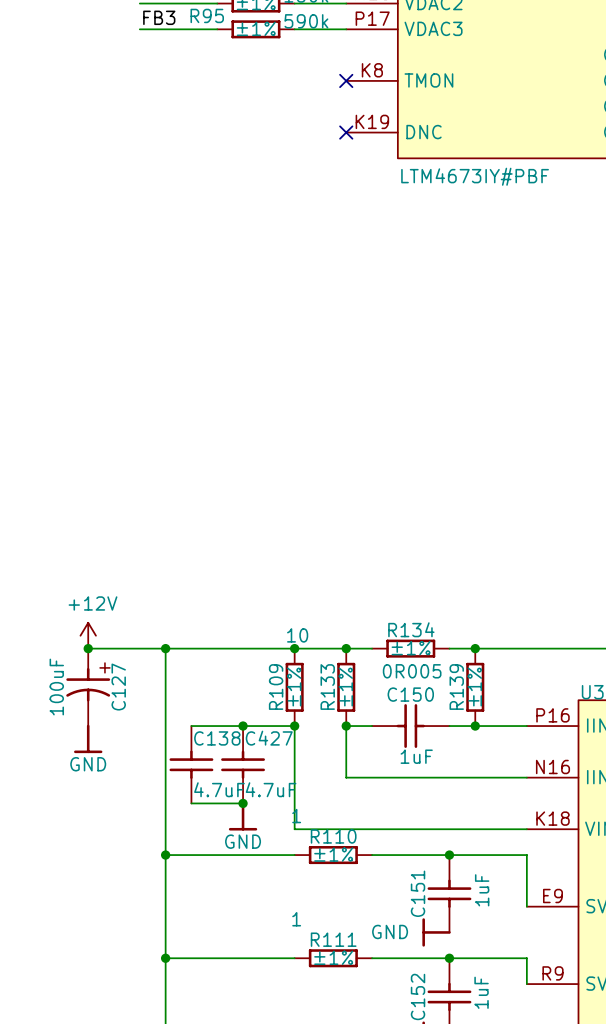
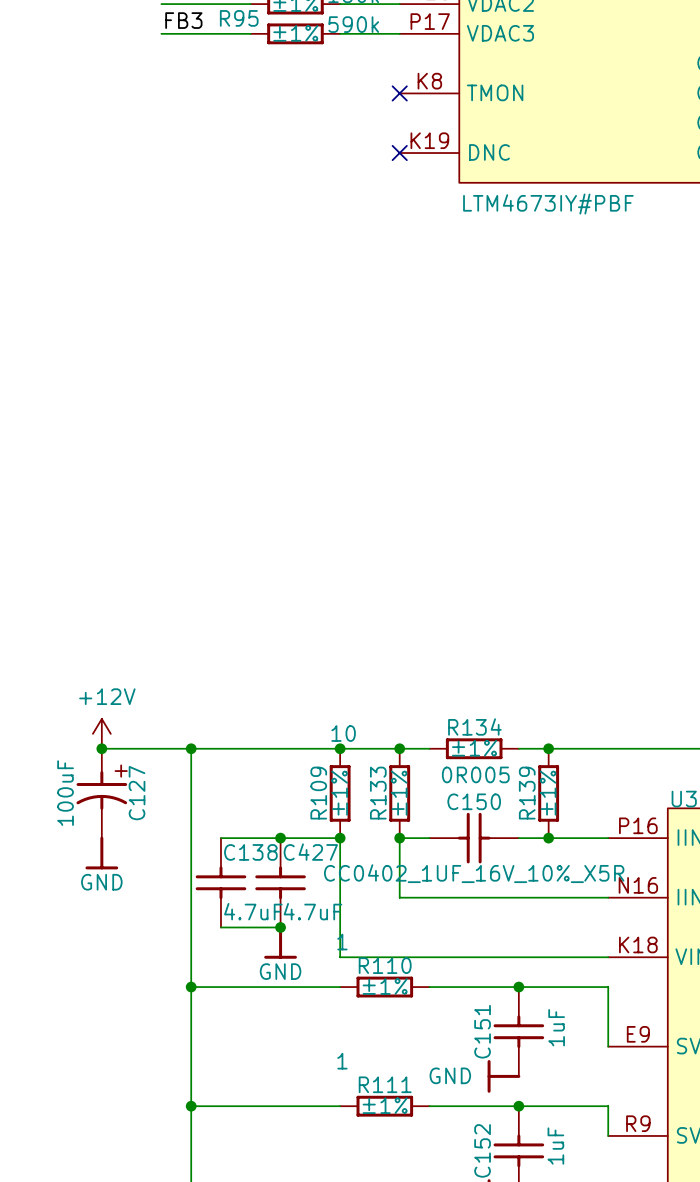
C150 value: none -> CC0402_1UF_16V_10%_X5R (474, 873)
C150 text: 1uF (416, 756) -> none

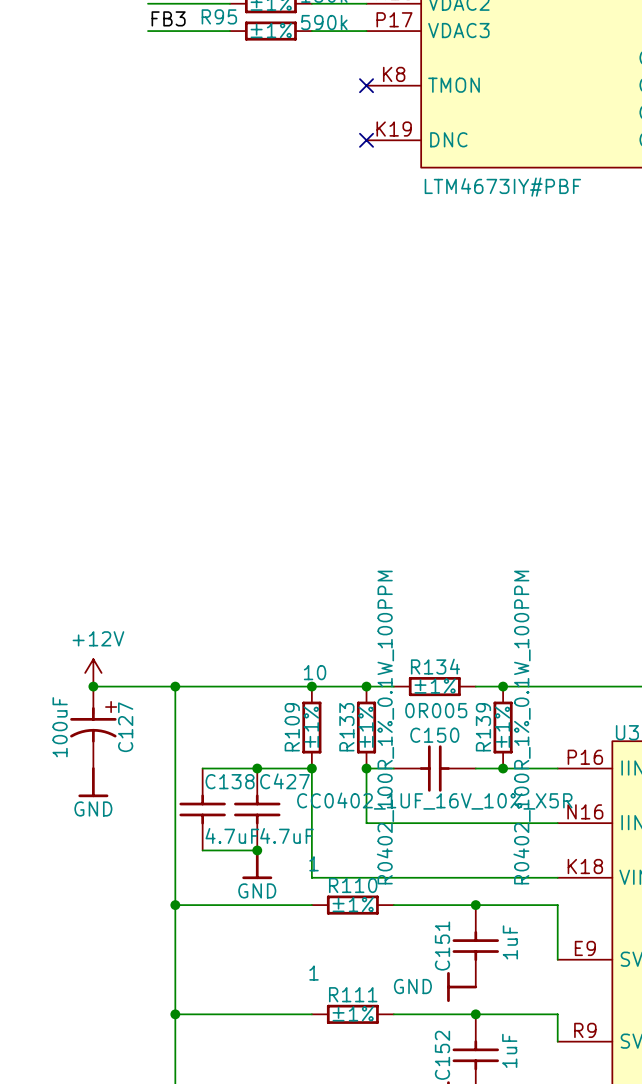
R133 value: none -> R0402_100R_1%_0.1W_100PPM (385, 727)
R139 value: none -> R0402_100R_1%_0.1W_100PPM (522, 727)

